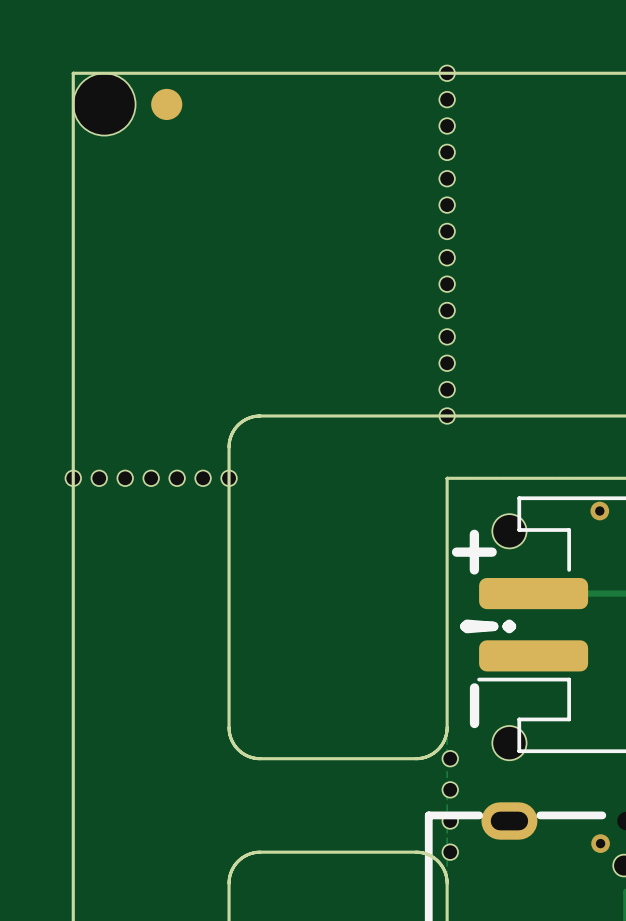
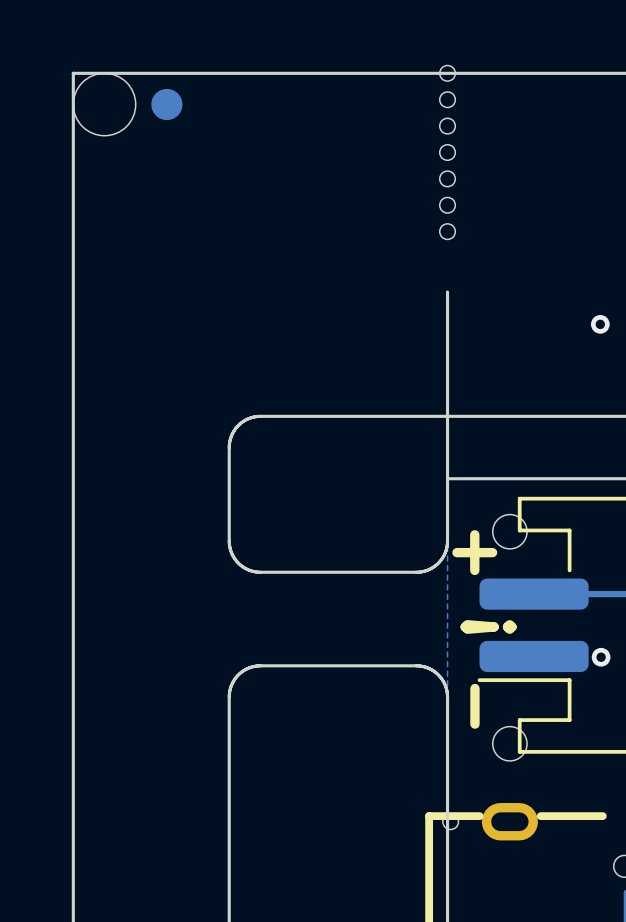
part: (447, 257) -> none
part: (447, 284) -> none
board edge: none -> (447, 292) (447, 479)
part: (447, 310) -> none
via: none -> (600, 324)
part: (447, 336) -> none
part: (447, 363) -> none
part: (447, 389) -> none
part: (447, 415) -> none
part: (73, 478) -> none
part: (99, 478) -> none
part: (125, 478) -> none
part: (151, 478) -> none
part: (177, 478) -> none
part: (203, 478) -> none
part: (229, 478) -> none
via: (599, 511) -> none
board edge: (229, 540) (229, 696) -> (447, 696) (445, 685) (438, 674) (428, 668) (416, 665) (255, 666) (245, 669) (236, 677) (231, 686) (229, 696)
board edge: (447, 540) (447, 696) -> (447, 541) (445, 553) (438, 563) (428, 569) (416, 572) (255, 571) (245, 568) (236, 560) (231, 551) (229, 541)
via: none -> (601, 657)
board edge: (447, 727) (444, 739) (438, 749) (427, 756) (416, 758) (255, 758) (245, 755) (236, 747) (230, 738) (229, 727) -> (447, 728) (447, 884)
part: (450, 758) -> none
part: (450, 789) -> none
via: (600, 843) -> none
part: (450, 852) -> none
board edge: (447, 883) (444, 871) (438, 861) (427, 854) (416, 852) (255, 852) (245, 855) (236, 863) (230, 872) (229, 883) -> (229, 728) (229, 884)

